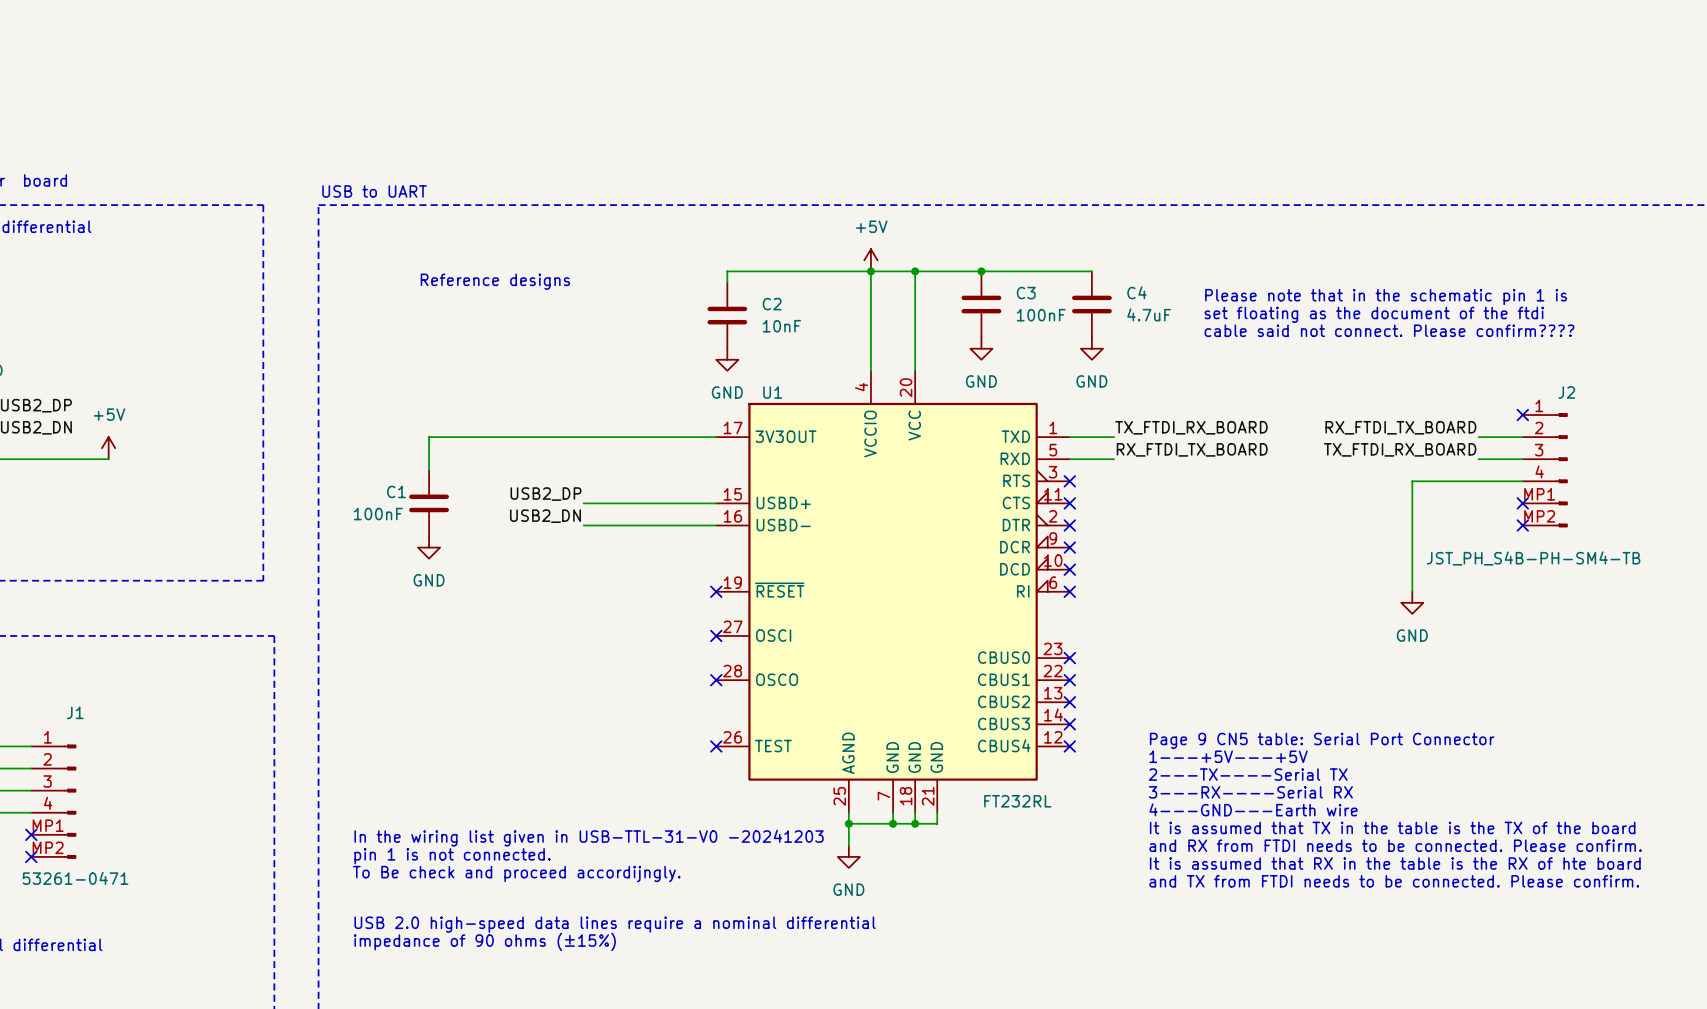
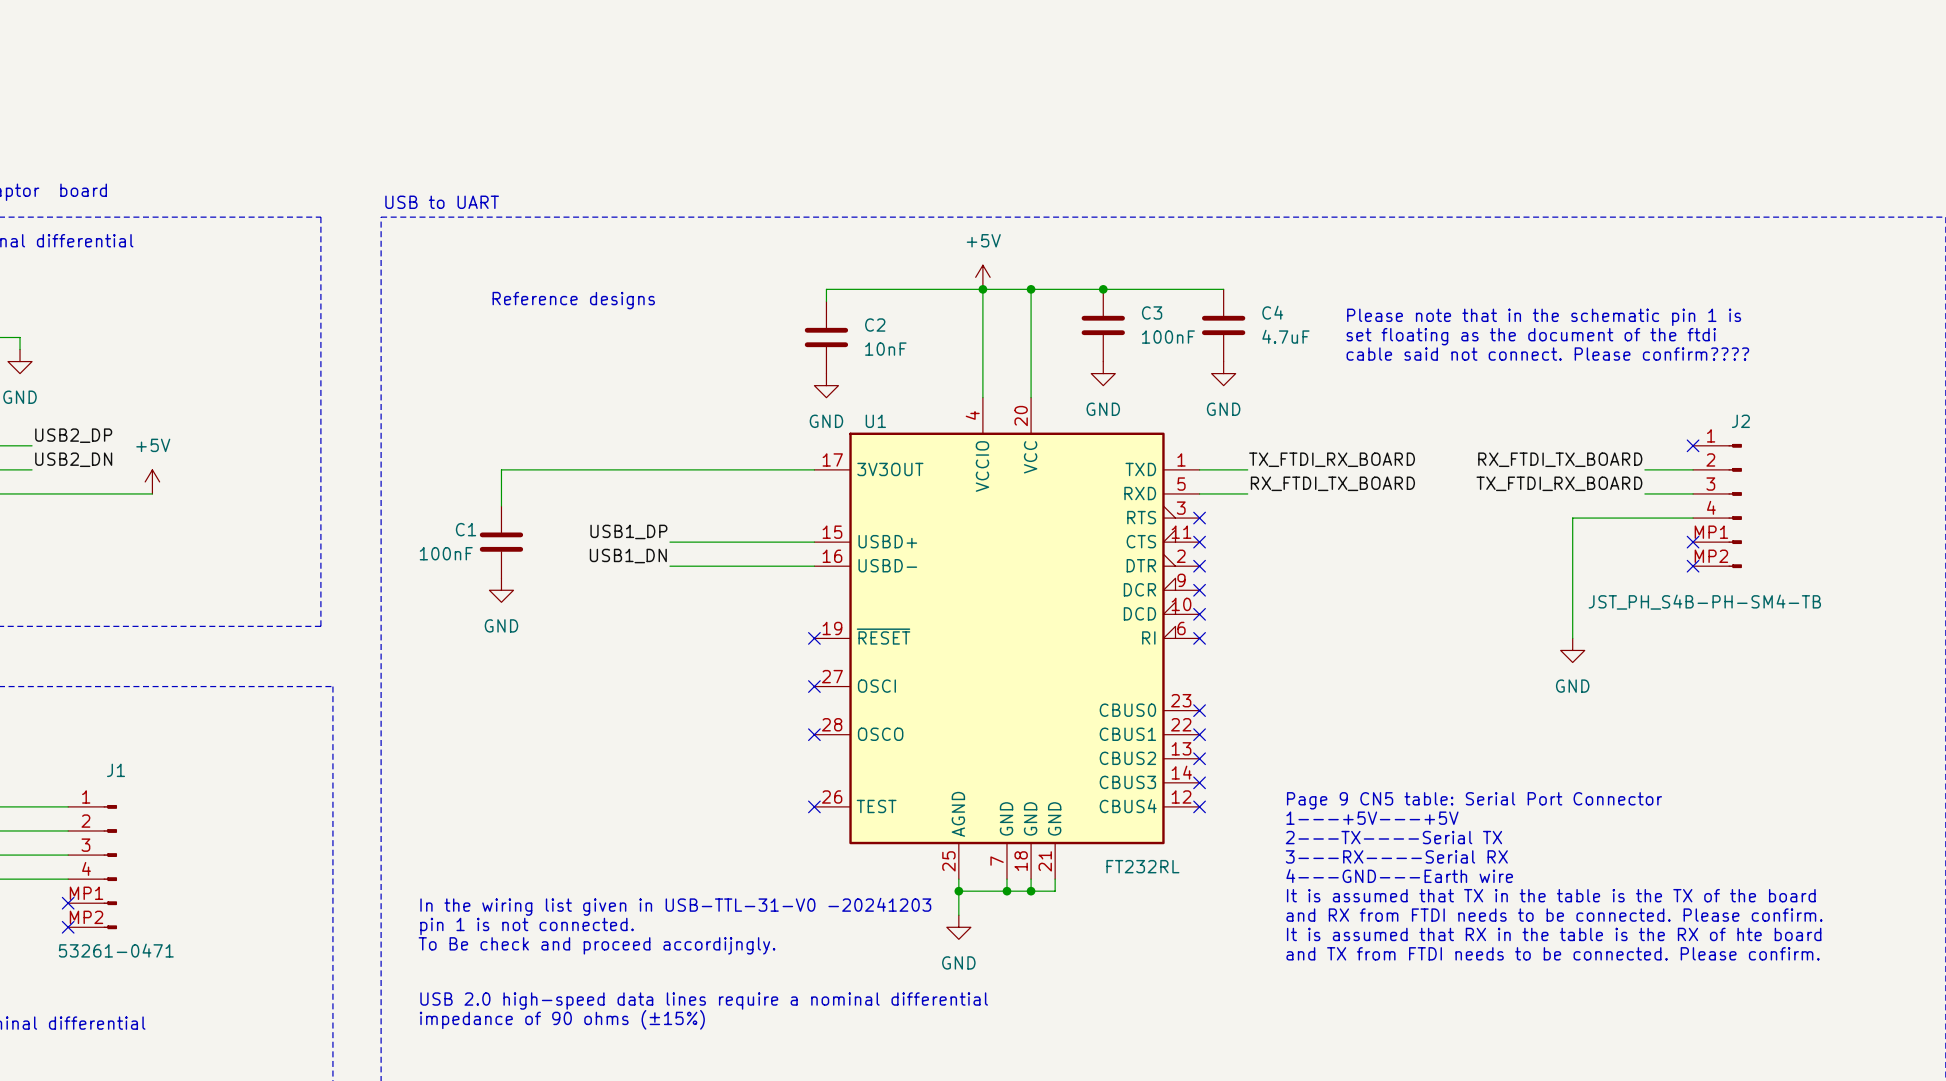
label: USB2_DP (546, 494) -> USB1_DP (628, 531)
label: USB2_DN (545, 516) -> USB1_DN (628, 556)

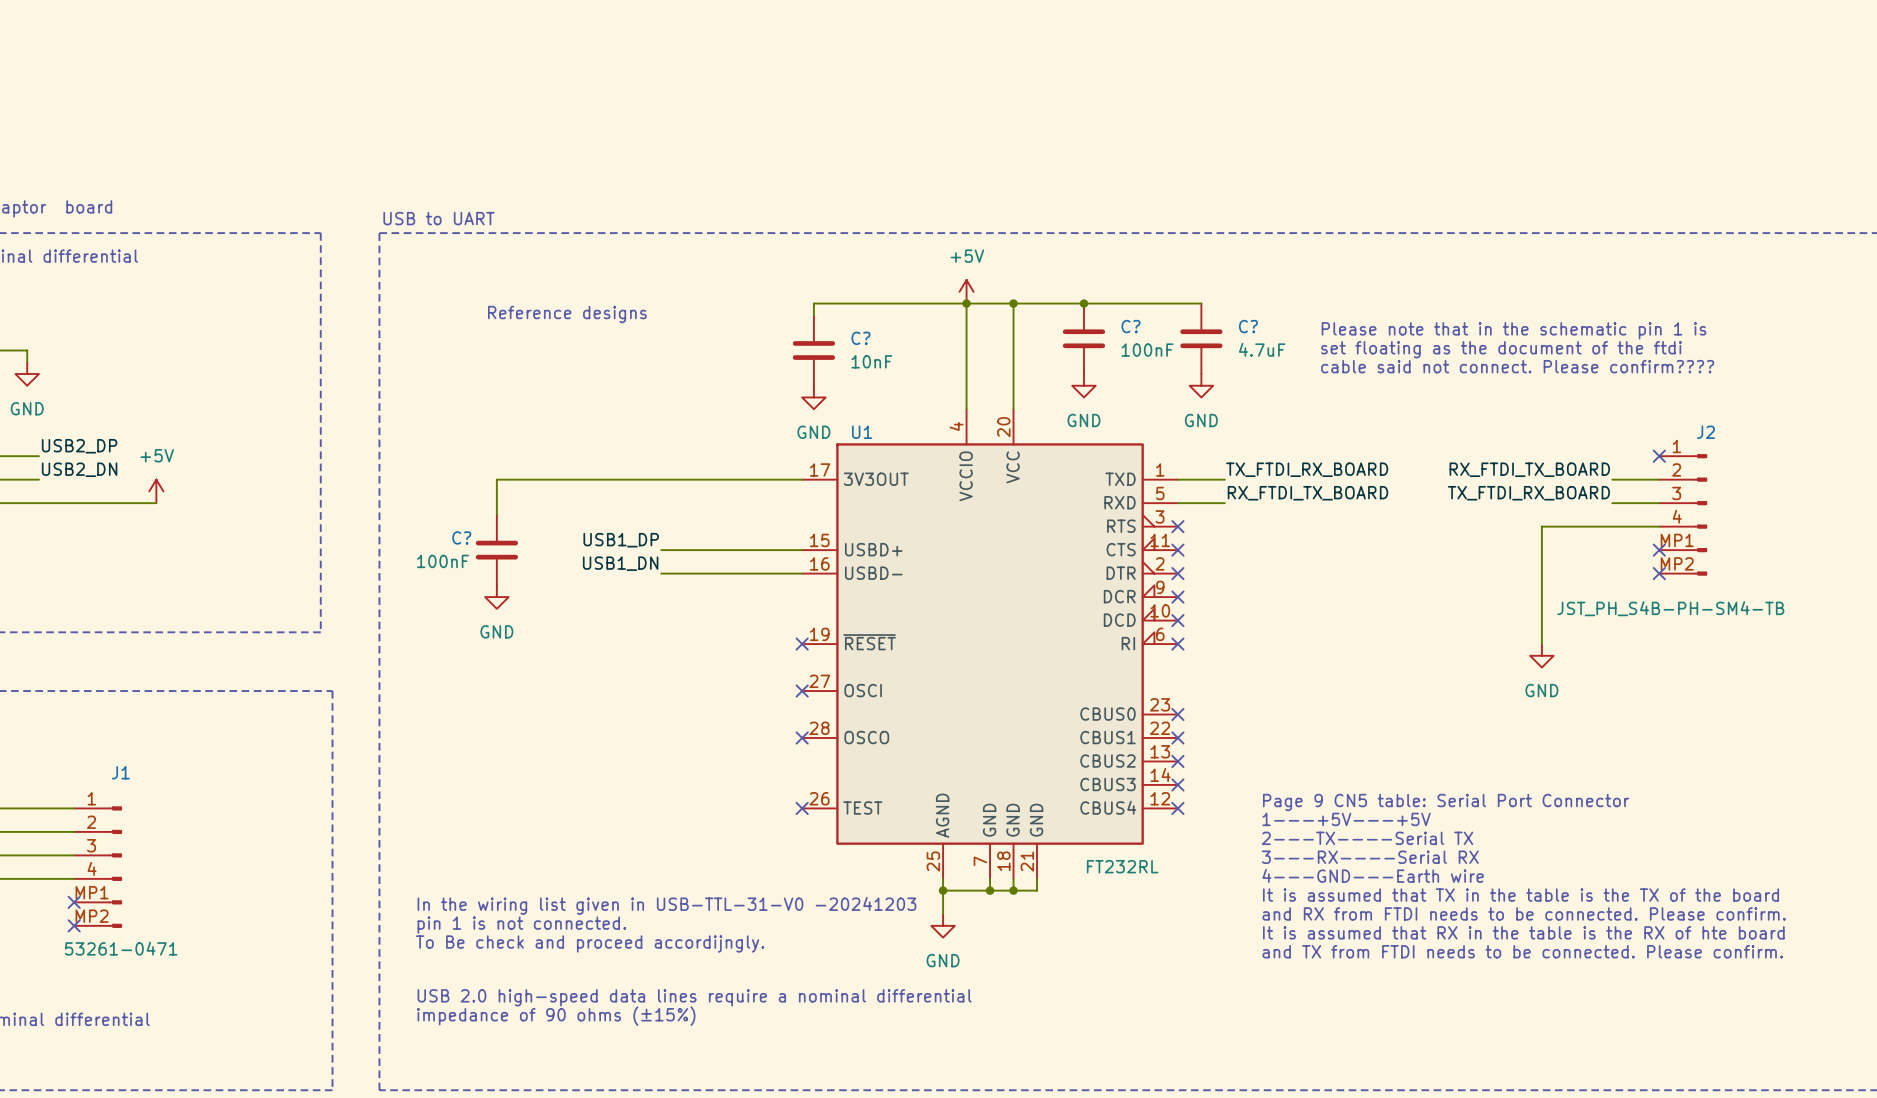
C3 name: C3 (1152, 312) -> C? (1131, 326)
C4 name: C4 (1272, 312) -> C? (1248, 326)
C2 name: C2 (875, 325) -> C? (860, 338)
C1 name: C1 (466, 529) -> C? (461, 537)

